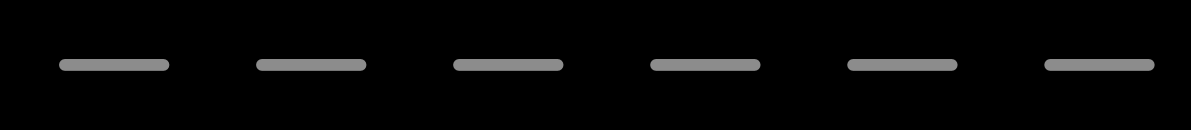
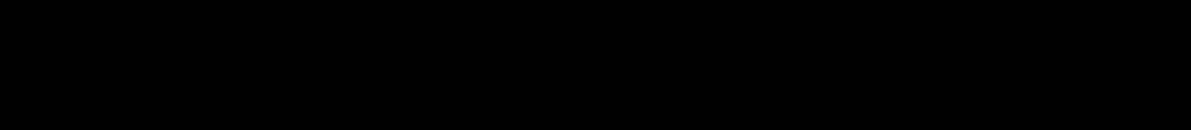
line: (64, 64) (163, 64) -> none
line: (261, 64) (360, 64) -> none
line: (459, 64) (557, 64) -> none
line: (656, 64) (754, 64) -> none
line: (853, 64) (951, 64) -> none
line: (1050, 64) (1148, 64) -> none

